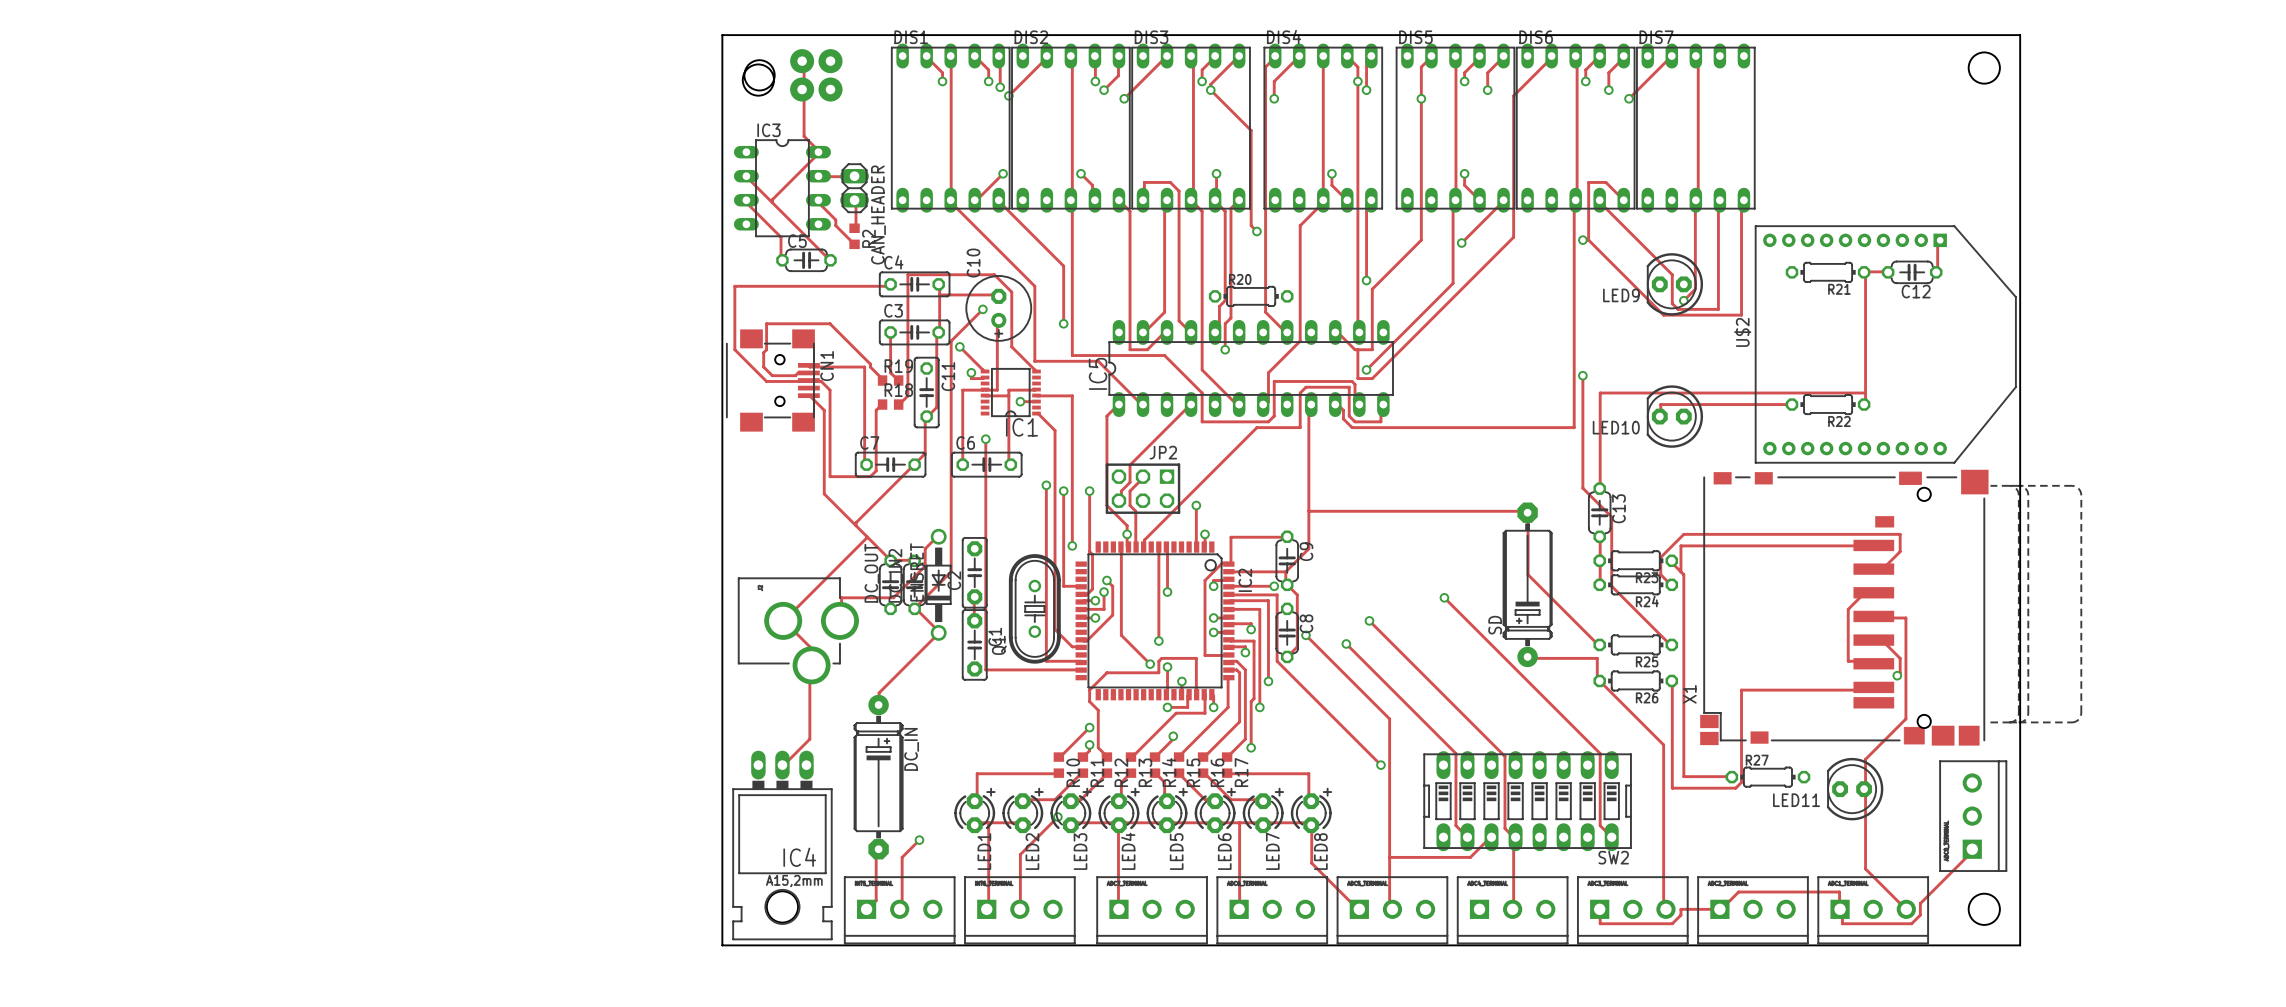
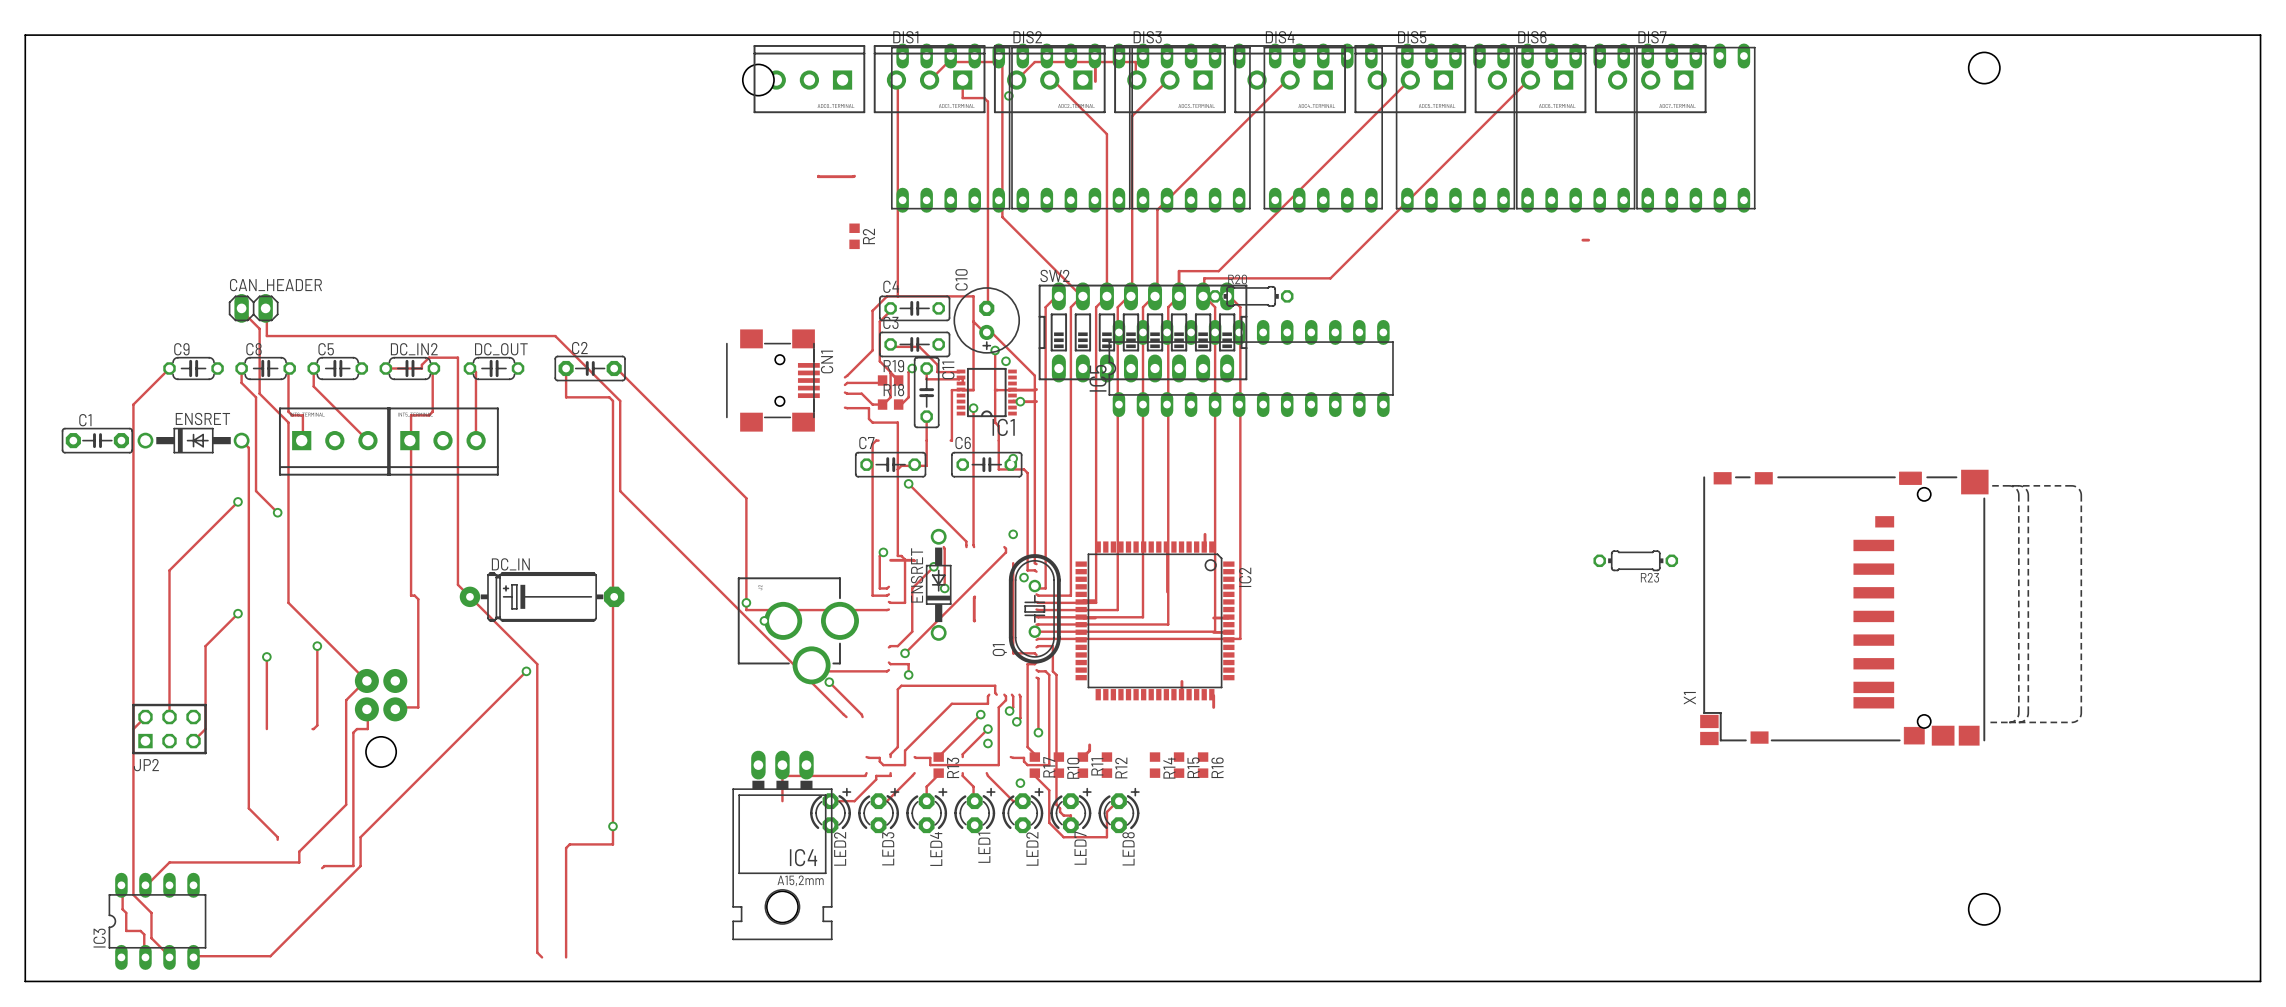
board edge: (722, 35) (722, 945) (2020, 945) (2020, 35) -> (722, 35) (25, 35) (25, 981) (2260, 981) (2260, 35) (2020, 35)
track: (926, 56) (942, 72) (942, 81) -> none
track: (950, 56) (951, 202) (1034, 286) (1034, 361) (1098, 361) (1143, 404) -> none
track: (974, 56) (988, 69) (988, 81) -> none
track: (998, 56) (1000, 87) -> none
track: (1046, 56) (1008, 95) -> none
track: (1070, 56) (1072, 355) (1164, 355) (1202, 393) (1202, 421) (1268, 421) (1274, 416) (1274, 381) (1352, 381) (1355, 384) (1355, 401) (1359, 404) -> none
track: (1118, 56) (1118, 75) (1104, 90) -> none
track: (1167, 56) (1124, 98) -> none
track: (1191, 56) (1193, 58) (1193, 199) (1191, 200) (1202, 211) (1202, 369) (1236, 404) (1239, 404) -> none
track: (1215, 56) (1202, 69) (1202, 81) -> none
track: (1239, 56) (1210, 84) (1210, 90) (1251, 130) (1251, 225) (1256, 231) -> none
track: (1275, 56) (1265, 67) (1265, 312) (1287, 332) -> none
track: (1299, 56) (1274, 81) (1274, 98) -> none
track: (1323, 56) (1323, 202) (1300, 225) (1300, 341) (1268, 372) (1268, 401) (1263, 404) -> none
track: (1347, 56) (1357, 67) (1359, 332) -> none
track: (1371, 56) (1366, 61) (1366, 90) -> none
track: (1431, 56) (1421, 67) (1421, 240) (1372, 289) (1372, 349) (1355, 349) (1337, 332) (1335, 332) -> none
track: (1455, 56) (1455, 199) (1453, 202) (1453, 283) (1366, 369) -> none
track: (1479, 56) (1464, 72) (1464, 81) -> none
track: (1503, 56) (1487, 72) (1487, 90) -> none
track: (1551, 56) (1513, 95) (1513, 237) (1372, 378) (1357, 378) (1357, 349) -> none
track: (1575, 56) (1577, 199) (1574, 202) (1574, 427) (1352, 427) (1343, 418) (1343, 410) (1335, 404) -> none
track: (1599, 56) (1585, 69) (1585, 81) -> none
track: (1623, 56) (1608, 72) (1608, 90) -> none
track: (1671, 56) (1629, 98) -> none
track: (1695, 56) (1698, 58) (1698, 199) (1695, 202) (1695, 289) (1683, 300) -> none
track: (802, 61) (804, 61) (804, 87) (802, 89) (804, 90) (804, 136) (818, 150) (818, 153) (772, 199) (772, 202) -> none
part: (793, 75) -> none
track: none -> (896, 80) (897, 296)
track: none -> (929, 80) (948, 62) (1002, 62) (1002, 217) (1081, 296)
track: none -> (962, 80) (962, 98) (984, 98) (987, 101) (986, 308)
track: none -> (1016, 80) (1034, 62) (1135, 62) (1136, 80)
track: none -> (1049, 80) (1052, 80) (1106, 134) (1106, 296) (1096, 307) (1096, 602) (1036, 601)
track: none -> (1169, 80) (1132, 116) (1132, 296) (1128, 296) (1117, 307) (1117, 610) (1036, 609)
track: none -> (1290, 80) (1287, 80) (1167, 200)
track: none -> (1530, 80) (1330, 278) (1204, 278) (1204, 296) (1215, 307) (1215, 631) (1036, 632)
via: (942, 81) -> none
via: (988, 81) -> none
via: (1095, 81) -> none
via: (1202, 81) -> none
via: (1357, 81) -> none
via: (1464, 81) -> none
via: (1585, 81) -> none
via: (1000, 87) -> none
via: (1104, 90) -> none
via: (1210, 90) -> none
via: (1366, 90) -> none
via: (1487, 90) -> none
via: (1608, 90) -> none
via: (1124, 98) -> none
via: (1274, 98) -> none
via: (1421, 98) -> none
via: (1629, 98) -> none
track: (1003, 173) (974, 200) -> none
via: (1003, 173) -> none
track: (1080, 173) (1092, 185) (1092, 199) (1094, 200) -> none
via: (1080, 173) -> none
track: (1216, 173) (1215, 200) (1225, 211) (1225, 300) (1219, 306) (1219, 329) (1215, 332) -> none
via: (1216, 173) -> none
track: (1331, 173) (1331, 185) (1347, 200) -> none
via: (1331, 173) -> none
track: (1464, 173) (1464, 185) (1479, 200) -> none
via: (1464, 173) -> none
track: (746, 176) (830, 260) -> none
IC3 rotation: 0° (782, 188) -> 90° counterclockwise (157, 921)
IC3 position: (782, 188) -> (157, 921)
CAN_HEADER: (854, 188) -> none
track: (746, 200) (746, 202) (781, 237) (782, 260) -> none
track: (818, 200) (818, 202) (835, 219) (835, 225) (854, 244) -> none
track: (854, 200) (854, 228) -> none
track: (998, 200) (1063, 266) (1063, 323) -> none
track: (1118, 200) (1130, 211) (1130, 349) (1147, 349) (1164, 332) (1167, 332) -> none
track: (1143, 200) (1144, 182) (1170, 182) (1179, 191) (1179, 271) -> (1410, 80) (1218, 271) (1179, 271)
track: (1239, 200) (1230, 208) (1230, 318) (1225, 323) (1225, 349) -> none
track: (1371, 200) (1366, 205) (1366, 280) -> none
track: (1503, 200) (1461, 243) -> none
track: (1599, 200) (1672, 274) (1672, 303) (1678, 309) (1718, 309) (1719, 200) -> none
track: (1623, 200) (1605, 182) (1588, 182) (1588, 240) (1663, 315) (1741, 315) (1741, 202) (1743, 200) -> none
track: (1164, 202) (1164, 312) (1143, 332) -> (1164, 202) (1157, 209) (1157, 296) (1153, 296) (1143, 307) (1143, 617) (1036, 617)
via: (1256, 231) -> none
via: (1582, 240) -> none
track: (1940, 240) (1937, 243) (1936, 272) -> none
via: (1461, 243) -> none
C5 position: (806, 260) -> (337, 368)
R21: (1828, 272) -> none
track: (1888, 272) (1864, 272) (1864, 404) -> none
C12: (1912, 272) -> none
via: (1366, 280) -> none
track: (890, 284) (890, 286) (734, 286) (734, 349) (766, 381) (821, 381) (830, 390) (830, 476) (870, 476) (876, 470) (876, 410) (881, 404) -> (844, 392) (861, 393) (872, 404) (881, 404)
C4 position: (914, 284) -> (914, 308)
track: (938, 284) (939, 332) (936, 332) (936, 407) (925, 418) (925, 453) (856, 522) (856, 525) -> none
LED9: (1674, 284) -> none
track: (939, 294) (998, 296) -> none
track: none -> (1058, 296) (1056, 296) (1045, 307) (1045, 588) (1036, 586)
track: none -> (1081, 296) (1070, 307) (1070, 595) (1036, 594)
track: (1179, 296) (1179, 320) (1191, 332) -> (1179, 296) (1168, 307) (1168, 624) (1036, 624)
track: none -> (1227, 296) (1229, 296) (1240, 307) (1240, 638) (1036, 639)
via: (1683, 300) -> none
track: none -> (241, 308) (241, 310) (259, 328) (259, 393) (288, 422) (288, 602) (366, 680) (346, 700) (346, 804) (299, 851) (299, 862) (169, 862) (145, 885)
CAN_HEADER: none -> (253, 308)
track: none -> (265, 308) (266, 336) (555, 336) (620, 400) (620, 491) (846, 717)
C10 position: (998, 308) -> (986, 320)
track: (982, 309) (951, 341) (951, 571) (914, 608) (938, 632) (879, 693) (878, 705) -> none
via: (982, 309) -> none
track: (998, 320) (997, 390) -> (1008, 390) (997, 390)
track: none -> (973, 321) (984, 332) (991, 332) (1034, 375) (1034, 563) (1036, 564)
via: (1063, 323) -> none
track: (890, 332) (890, 344) -> none
C3 position: (914, 332) -> (914, 344)
U$2: (1885, 344) -> none
track: (890, 346) (890, 372) -> (890, 308) (890, 310) (879, 321) (879, 361) (890, 372)
track: none -> (890, 346) (919, 346) (937, 364) (937, 372) (961, 371)
track: (959, 346) (985, 371) -> none
via: (959, 346) -> none
via: (1225, 349) -> none
track: none -> (995, 350) (995, 422) (998, 426) (998, 469) (1024, 469) (1027, 473) (1027, 570) (1036, 571)
via: none -> (995, 350)
via: none -> (1005, 361)
track: (808, 365) (809, 367) (864, 367) (864, 462) (866, 464) -> none
track: none -> (169, 368) (133, 404) (133, 894) (151, 912) (151, 938) (169, 957)
track: none -> (241, 368) (241, 382) (256, 397) (256, 491) (277, 512)
track: none -> (289, 368) (288, 411) (292, 415) (302, 415) (301, 440)
track: none -> (313, 368) (313, 386) (367, 440)
track: none -> (385, 368) (421, 368) (421, 364) (429, 357) (457, 357) (457, 584) (537, 664) (537, 952) (542, 957)
track: none -> (433, 368) (432, 411) (429, 415) (411, 415) (411, 595) (414, 595) (418, 599) (418, 707) (396, 707) (395, 709)
track: none -> (469, 368) (475, 372) (475, 440)
DC_OUT: none -> (494, 368)
track: none -> (566, 368) (566, 397) (609, 397) (612, 400) (614, 596) (612, 844) (569, 844) (566, 848) (566, 957)
track: none -> (614, 368) (616, 368) (746, 498) (746, 610) (888, 609)
via: none -> (912, 368)
track: none -> (926, 368) (926, 379) (959, 379) (961, 377) (962, 379) (961, 383)
via: (1366, 369) -> none
track: (1036, 371) (1011, 346) (1011, 292) (994, 274) (907, 274) (907, 395) (899, 404) -> (912, 368) (908, 372) (908, 397) (899, 404)
track: (808, 372) (798, 372) (795, 375) (772, 375) (763, 367) (763, 352) (766, 349) (766, 323) (830, 323) (870, 364) (870, 367) (882, 380) -> (844, 384) (847, 382) (879, 382) (882, 380)
track: none -> (890, 372) (890, 397) (882, 404)
track: (971, 372) (971, 378) (985, 377) -> none
via: (971, 372) -> none
track: (1582, 375) (1582, 488) (1611, 517) (1611, 586) (1671, 644) -> none
via: (1582, 375) -> none
track: (962, 390) (962, 464) -> (962, 390) (951, 390) (950, 440)
track: (973, 390) (995, 390) -> (973, 390) (973, 296) (887, 296) (872, 310) (872, 350) (844, 377)
track: (1008, 390) (1008, 462) (1010, 464) -> none
IC1 position: (1010, 392) -> (986, 392)
track: (1865, 393) (1600, 393) (1599, 488) -> none
track: (808, 395) (824, 410) (824, 493) (890, 560) -> none
track: (985, 395) (1008, 395) -> none
track: (1036, 395) (1072, 395) (1072, 545) -> none
track: (1118, 404) (1106, 416) (1106, 505) (1127, 525) (1128, 547) -> none
track: (1191, 404) (1130, 465) (1130, 482) (1121, 491) (1121, 499) (1118, 500) -> none
track: (1311, 404) (1308, 404) (1308, 548) (1285, 571) -> none
track: (1383, 404) (1380, 404) (1380, 421) (1355, 421) (1349, 416) (1349, 387) (1305, 387) (1300, 393) (1300, 427) (1256, 427) (1144, 540) (1143, 547) -> none
track: (1792, 404) (1660, 404) (1659, 416) -> none
R22: (1828, 404) -> none
track: none -> (844, 407) (868, 408) (868, 418) (872, 422) (897, 422) (897, 555) (901, 555) (905, 559) (905, 602) (888, 601)
track: none -> (973, 408) (974, 547)
via: none -> (973, 408)
track: (1036, 413) (1055, 430) (1055, 629) (1072, 646) (1081, 647) -> none
track: none -> (926, 416) (926, 465) (901, 465) (897, 469)
LED10: (1674, 416) -> none
track: (985, 439) (985, 669) (1081, 670) -> none
via: (985, 439) -> none
ENSRET: none -> (193, 440)
track: none -> (241, 440) (248, 447) (248, 808) (277, 837) (277, 839)
track: none -> (878, 440) (872, 444) (872, 595) (888, 594)
via: none -> (1013, 458)
track: (1143, 476) (1130, 491) (1130, 505) (1135, 511) (1136, 547) -> none
track: none -> (908, 483) (966, 541) (966, 547)
via: none -> (908, 483)
track: (1046, 485) (1046, 661) (1081, 662) -> none
via: (1046, 485) -> none
JP2 rotation: 0° (1143, 488) -> 180° (169, 729)
JP2 position: (1143, 488) -> (169, 729)
track: (1063, 491) (1063, 586) (1081, 586) -> none
via: (1063, 491) -> none
track: (1089, 491) (1089, 551) (1092, 554) (1092, 589) (1086, 594) (1081, 594) -> none
via: (1089, 491) -> none
track: none -> (238, 501) (169, 570) (169, 717)
via: none -> (238, 501)
track: (1196, 505) (1196, 547) -> none
via: (1196, 505) -> none
track: (1308, 511) (1525, 511) (1528, 514) (1528, 574) (1599, 644) -> none
via: none -> (277, 512)
C13: (1599, 512) -> none
via: none -> (1013, 534)
via: (1127, 534) -> none
via: (1205, 534) -> none
track: (938, 536) (925, 548) (925, 566) (893, 597) (841, 597) (841, 620) (839, 620) -> none
track: (1287, 536) (1230, 537) (1230, 563) (1222, 563) (1205, 580) (1205, 655) (1228, 654) -> none
track: (1599, 536) (1599, 584) -> none
track: (867, 537) (783, 620) (809, 646) (809, 664) (811, 665) (809, 667) (809, 739) (782, 765) -> none
via: (1072, 545) -> none
track: (1873, 545) (1680, 545) (1680, 571) -> none
track: none -> (943, 547) (944, 588)
track: none -> (1004, 547) (1005, 552) (905, 653)
track: (1120, 547) (1121, 635) (1150, 664) -> none
track: (1158, 547) (1158, 641) -> none
track: none -> (883, 552) (879, 555) (879, 588) (888, 586)
via: none -> (883, 552)
C9 rotation: 0° (1287, 560) -> 90° counterclockwise (193, 368)
C9 position: (1287, 560) -> (193, 368)
track: (1671, 560) (1683, 574) (1683, 776) (1731, 777) -> none
track: none -> (1013, 563) (1013, 653) (1036, 654)
track: none -> (933, 566) (912, 588) (912, 631) (897, 646) (888, 647)
via: none -> (933, 566)
track: (1873, 569) (1882, 568) (1900, 551) (1900, 534) (1683, 534) (1660, 557) (1660, 574) (1671, 584) -> none
track: (1228, 571) (1285, 571) -> none
track: (1285, 571) (1285, 583) (1297, 594) (1297, 646) (1287, 656) -> none
C2 rotation: 0° (974, 572) -> 90° clockwise (590, 368)
C2 position: (974, 572) -> (590, 368)
via: none -> (1024, 577)
track: (1228, 579) (1213, 580) (1213, 586) -> none
track: (1106, 580) (1112, 586) (1112, 615) (1086, 641) (1081, 639) -> none
via: (1106, 580) -> none
DC_OUT: (890, 584) -> none
DC_IN2 rotation: 0° (914, 584) -> 90° clockwise (409, 368)
DC_IN2 position: (914, 584) -> (409, 368)
SD: (1527, 584) -> none
R24: (1635, 584) -> none
via: (1213, 586) -> none
track: (1274, 586) (1228, 586) -> none
via: (1274, 586) -> none
via: none -> (944, 588)
track: (1104, 592) (1104, 609) (1081, 609) -> none
via: (1104, 592) -> none
via: (1167, 592) -> none
track: (1873, 592) (1871, 594) (1862, 594) (1848, 609) (1848, 661) (1871, 661) (1873, 663) -> none
track: (1228, 594) (1277, 594) (1277, 661) (1380, 765) -> none
DC_IN: none -> (542, 596)
track: (1444, 597) (1600, 753) (1600, 825) (1611, 837) -> none
via: (1444, 597) -> none
via: (1095, 600) -> none
track: (1228, 601) (1268, 600) (1268, 681) -> none
via: none -> (746, 602)
track: (1228, 609) (1259, 609) (1259, 707) -> none
track: none -> (238, 613) (205, 646) (205, 729) (193, 741)
via: none -> (238, 613)
track: (1873, 616) (1874, 618) (1905, 618) (1905, 718) (1865, 759) (1865, 868) (1906, 909) -> none
via: (1095, 618) -> none
via: (1213, 618) -> none
via: none -> (764, 620)
track: (1369, 620) (1505, 756) (1505, 828) (1513, 837) -> none
via: (1369, 620) -> none
track: (1228, 624) (1251, 623) (1251, 629) -> none
via: (1251, 629) -> none
via: (1213, 632) -> none
C8 rotation: 0° (1287, 632) -> 90° counterclockwise (265, 368)
C8 position: (1287, 632) -> (265, 368)
track: (1305, 635) (1389, 718) (1389, 909) (1392, 909) -> none
via: (1305, 635) -> none
track: (1228, 639) (1254, 641) (1254, 698) (1251, 701) (1251, 747) -> none
track: (1873, 640) (1882, 641) (1900, 658) (1900, 672) (1897, 675) -> none
via: (1158, 641) -> none
track: (1346, 643) (1455, 753) (1455, 825) (1467, 837) -> none
via: (1346, 643) -> none
C1 rotation: 0° (974, 644) -> 90° counterclockwise (97, 440)
C1 position: (974, 644) -> (97, 440)
R25: (1635, 644) -> none
track: none -> (317, 646) (317, 725) (312, 729)
via: none -> (317, 646)
track: (1228, 647) (1245, 646) (1245, 652) -> none
via: (1245, 652) -> none
via: none -> (905, 653)
track: none -> (266, 656) (266, 729)
via: none -> (266, 656)
track: (1527, 656) (1597, 658) (1597, 678) (1663, 744) (1663, 909) (1665, 909) -> none
track: none -> (888, 662) (908, 664) (908, 674)
track: none -> (1036, 662) (1027, 664) (1027, 747) (1034, 754) (1034, 757)
track: (1228, 662) (1236, 661) (1245, 669) (1245, 739) (1227, 757) -> none
via: (1150, 664) -> none
track: (1167, 667) (1166, 694) -> none
via: (1167, 667) -> none
track: none -> (888, 670) (814, 671)
track: none -> (1036, 670) (1045, 671) (1049, 674) (1049, 765) (1027, 765) (1024, 761) (1024, 757) (1010, 757)
track: (1228, 670) (1236, 669) (1239, 672) (1239, 721) (1203, 757) -> none
track: none -> (526, 671) (360, 837) (360, 866) (270, 956) (193, 957)
via: none -> (526, 671)
via: none -> (908, 674)
via: (1897, 675) -> none
track: none -> (1036, 677) (1038, 678) (1038, 732)
track: (1228, 677) (1228, 707) (1179, 757) -> none
R26: (1635, 680) -> none
track: (1671, 680) (1672, 788) (1735, 788) (1741, 782) (1741, 690) (1871, 690) (1873, 687) -> none
via: (1181, 681) -> none
via: (1268, 681) -> none
track: none -> (829, 682) (862, 717)
via: none -> (829, 682)
track: none -> (989, 694) (987, 703) (951, 703) (905, 750) (905, 765) (883, 765) (879, 761) (879, 757) (866, 757)
track: none -> (996, 694) (995, 685) (901, 685) (897, 689) (897, 747) (890, 754) (890, 757)
track: none -> (1004, 694) (1005, 700) (998, 707) (998, 765) (930, 765) (930, 757) (914, 757)
track: none -> (1011, 694) (1013, 707) (1009, 711)
track: none -> (1019, 694) (1020, 718) (1016, 721)
track: (1189, 694) (1187, 707) (1167, 707) -> none
track: (1196, 694) (1196, 658) (1161, 658) (1158, 661) (1158, 672) (1106, 672) (1089, 690) (1089, 701) (1098, 710) (1098, 747) (1106, 757) -> none
track: (1204, 694) (1205, 713) (1176, 713) (1130, 757) -> none
via: (1167, 707) -> none
via: (1213, 707) -> none
via: (1259, 707) -> none
track: none -> (366, 709) (367, 729) (356, 729) (353, 732) (353, 866) (324, 866) (322, 868)
via: none -> (1009, 711)
track: none -> (980, 714) (938, 757)
via: none -> (980, 714)
track: none -> (145, 717) (133, 729)
part: none -> (381, 718)
via: none -> (1016, 721)
track: (1089, 727) (1058, 757) -> none
via: (1089, 727) -> none
track: none -> (987, 729) (962, 754) (962, 757)
via: none -> (987, 729)
via: none -> (1038, 732)
track: (1173, 736) (1173, 739) (1155, 757) -> none
via: (1173, 736) -> none
via: none -> (987, 743)
via: (1089, 744) -> none
via: (1251, 747) -> none
R13 position: (1130, 765) -> (938, 765)
R17 position: (1227, 765) -> (1034, 765)
via: (1380, 765) -> none
track: none -> (866, 773) (865, 775) (782, 775) (782, 801)
track: none -> (890, 773) (890, 775) (876, 775) (876, 779) (854, 801) (830, 801)
track: none -> (914, 773) (887, 801) (878, 801)
track: none -> (938, 773) (926, 786) (926, 801)
track: (1058, 773) (977, 773) (977, 799) (974, 801) -> (962, 773) (962, 775) (973, 786) (974, 801)
track: (1082, 773) (1055, 799) (1022, 801) -> (986, 773) (1013, 801) (1022, 801)
track: (1106, 773) (1080, 799) (1070, 801) -> none
track: (1130, 773) (1121, 782) (1121, 799) (1118, 801) -> (1034, 773) (1034, 775) (1049, 790) (1049, 822) (1063, 837) (1106, 837) (1106, 811) (1118, 801)
track: (1155, 773) (1164, 782) (1164, 799) (1167, 801) -> none
track: (1179, 773) (1205, 799) (1215, 801) -> none
track: (1203, 773) (1230, 799) (1263, 801) -> none
track: (1227, 773) (1308, 773) (1308, 799) (1311, 801) -> none
DC_IN: (878, 777) -> none
R27: (1767, 777) -> none
via: none -> (1020, 783)
LED11: (1855, 789) -> none
SW2 rotation: 0° (1527, 801) -> 180° (1143, 332)
SW2 position: (1527, 801) -> (1143, 332)
LED2: none -> (830, 810)
LED3: none -> (878, 810)
LED4: none -> (926, 810)
LED5: (1167, 810) -> none
LED6: (1215, 810) -> none
LED7: (1263, 810) -> none
LED8: (1311, 810) -> none
part rotation: 0° (1973, 816) -> 90° counterclockwise (809, 79)
part position: (1973, 816) -> (809, 79)
track: (1057, 817) (1020, 854) (1019, 909) -> none
via: (1057, 817) -> none
track: (988, 822) (988, 909) (986, 909) -> none
track: (1239, 822) (1239, 909) -> none
track: (974, 825) (977, 822) (1020, 822) (1022, 825) -> none
track: (1070, 825) (1072, 822) (1118, 822) (1118, 825) -> (1070, 825) (1070, 815) (1063, 815) (1056, 804) (1056, 674) (1052, 671) (1052, 646) (1036, 647)
via: none -> (612, 826)
track: (1491, 837) (1470, 857) (1389, 857) -> none
track: (1513, 837) (1512, 909) -> none
track: (919, 840) (902, 857) (902, 909) (899, 909) -> none
via: (919, 840) -> none
track: (878, 849) (876, 851) (876, 900) (866, 909) -> none
track: (1972, 849) (1972, 851) (1920, 903) (1920, 915) (1911, 923) (1842, 923) (1842, 909) (1839, 909) (1839, 892) (1738, 892) (1721, 909) (1680, 909) (1680, 915) (1672, 923) (1600, 923) (1599, 909) -> none
LED3 name: LED3 (1080, 851) -> LED7 (1080, 848)
LED4 name: LED4 (1128, 851) -> LED8 (1128, 848)
track: none -> (121, 885) (122, 909) (126, 912) (126, 930) (140, 930) (144, 934) (145, 957)
track: (1118, 909) (1118, 825) (1121, 822) (1164, 822) (1167, 825) (1167, 822) (1213, 822) (1215, 825) (1216, 822) (1262, 822) (1263, 825) (1265, 822) (1308, 822) (1311, 825) (1311, 863) (1359, 909) -> none
part position: (899, 910) -> (442, 441)
part position: (1019, 910) -> (334, 441)
part rotation: 0° (1152, 910) -> 180° (1650, 79)
part position: (1152, 910) -> (1650, 79)
part rotation: 0° (1272, 910) -> 180° (1530, 79)
part position: (1272, 910) -> (1530, 79)
part rotation: 0° (1392, 910) -> 180° (1410, 79)
part position: (1392, 910) -> (1410, 79)
part rotation: 0° (1512, 910) -> 180° (1290, 79)
part position: (1512, 910) -> (1290, 79)
part rotation: 0° (1632, 910) -> 180° (1169, 79)
part position: (1632, 910) -> (1169, 79)
part rotation: 0° (1753, 910) -> 180° (1049, 79)
part position: (1753, 910) -> (1049, 79)
part rotation: 0° (1873, 910) -> 180° (929, 79)
part position: (1873, 910) -> (929, 79)

